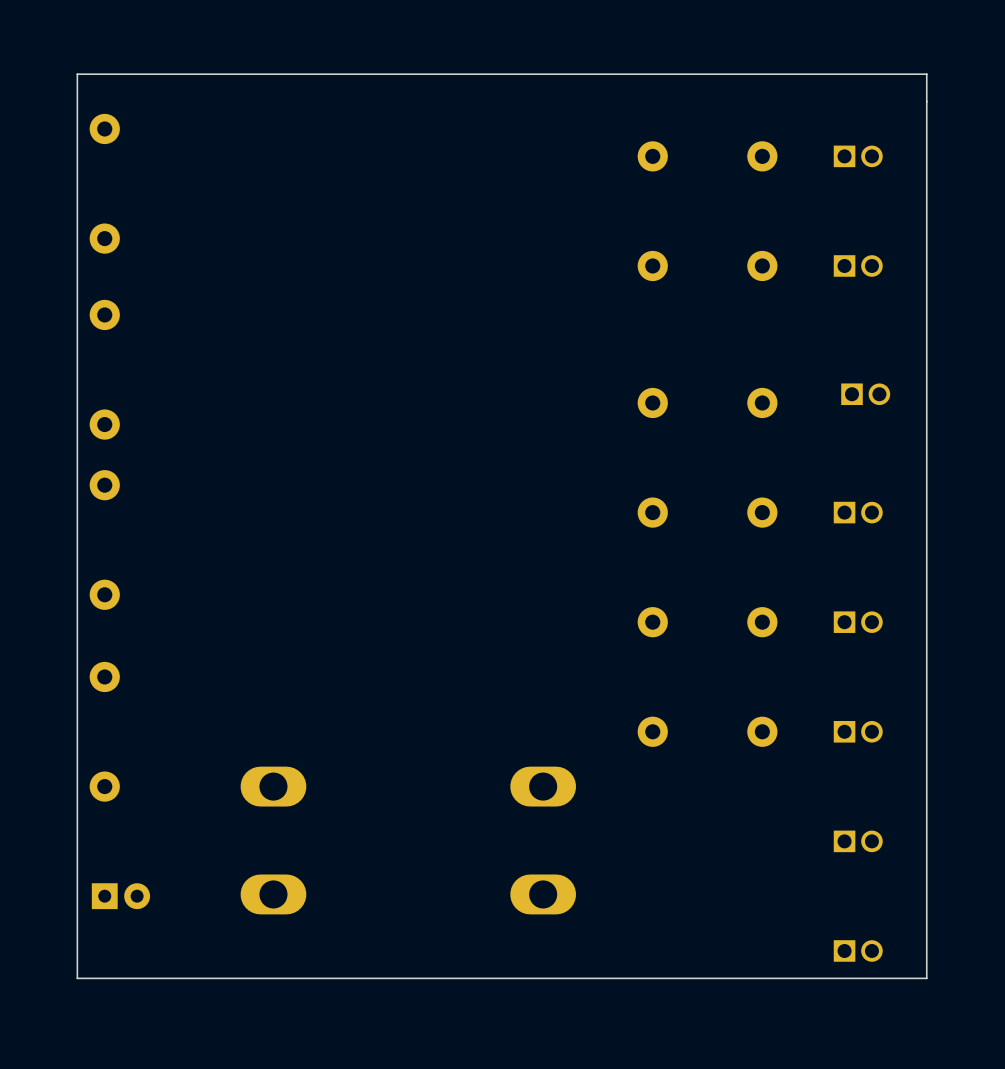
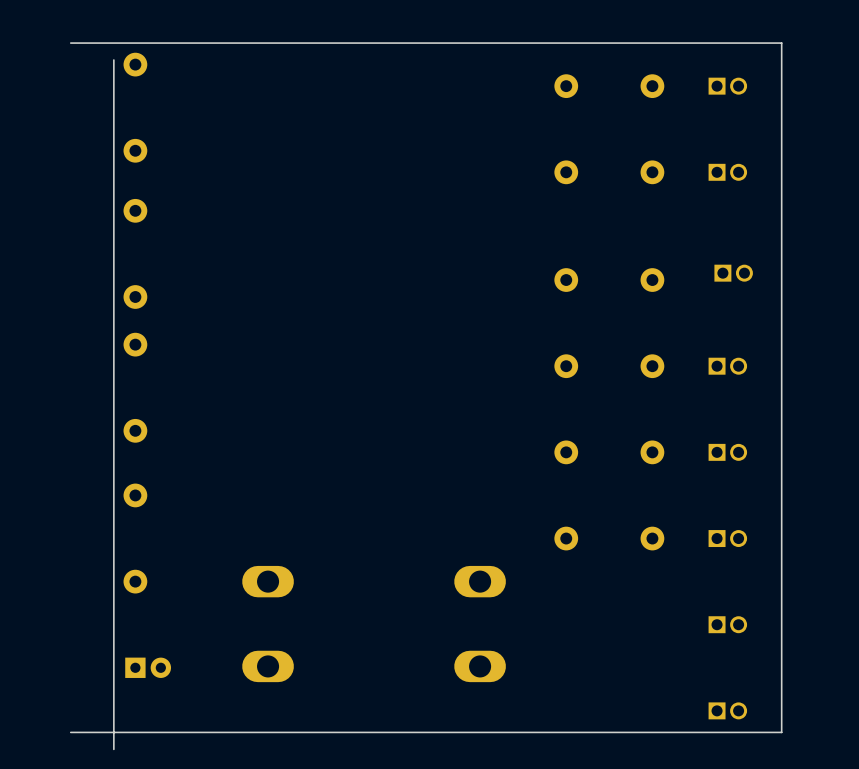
board edge: (926, 101) (926, 74) (77, 74) (77, 123) -> (781, 43) (70, 43)
board edge: none -> (70, 732) (113, 732) (113, 749)

